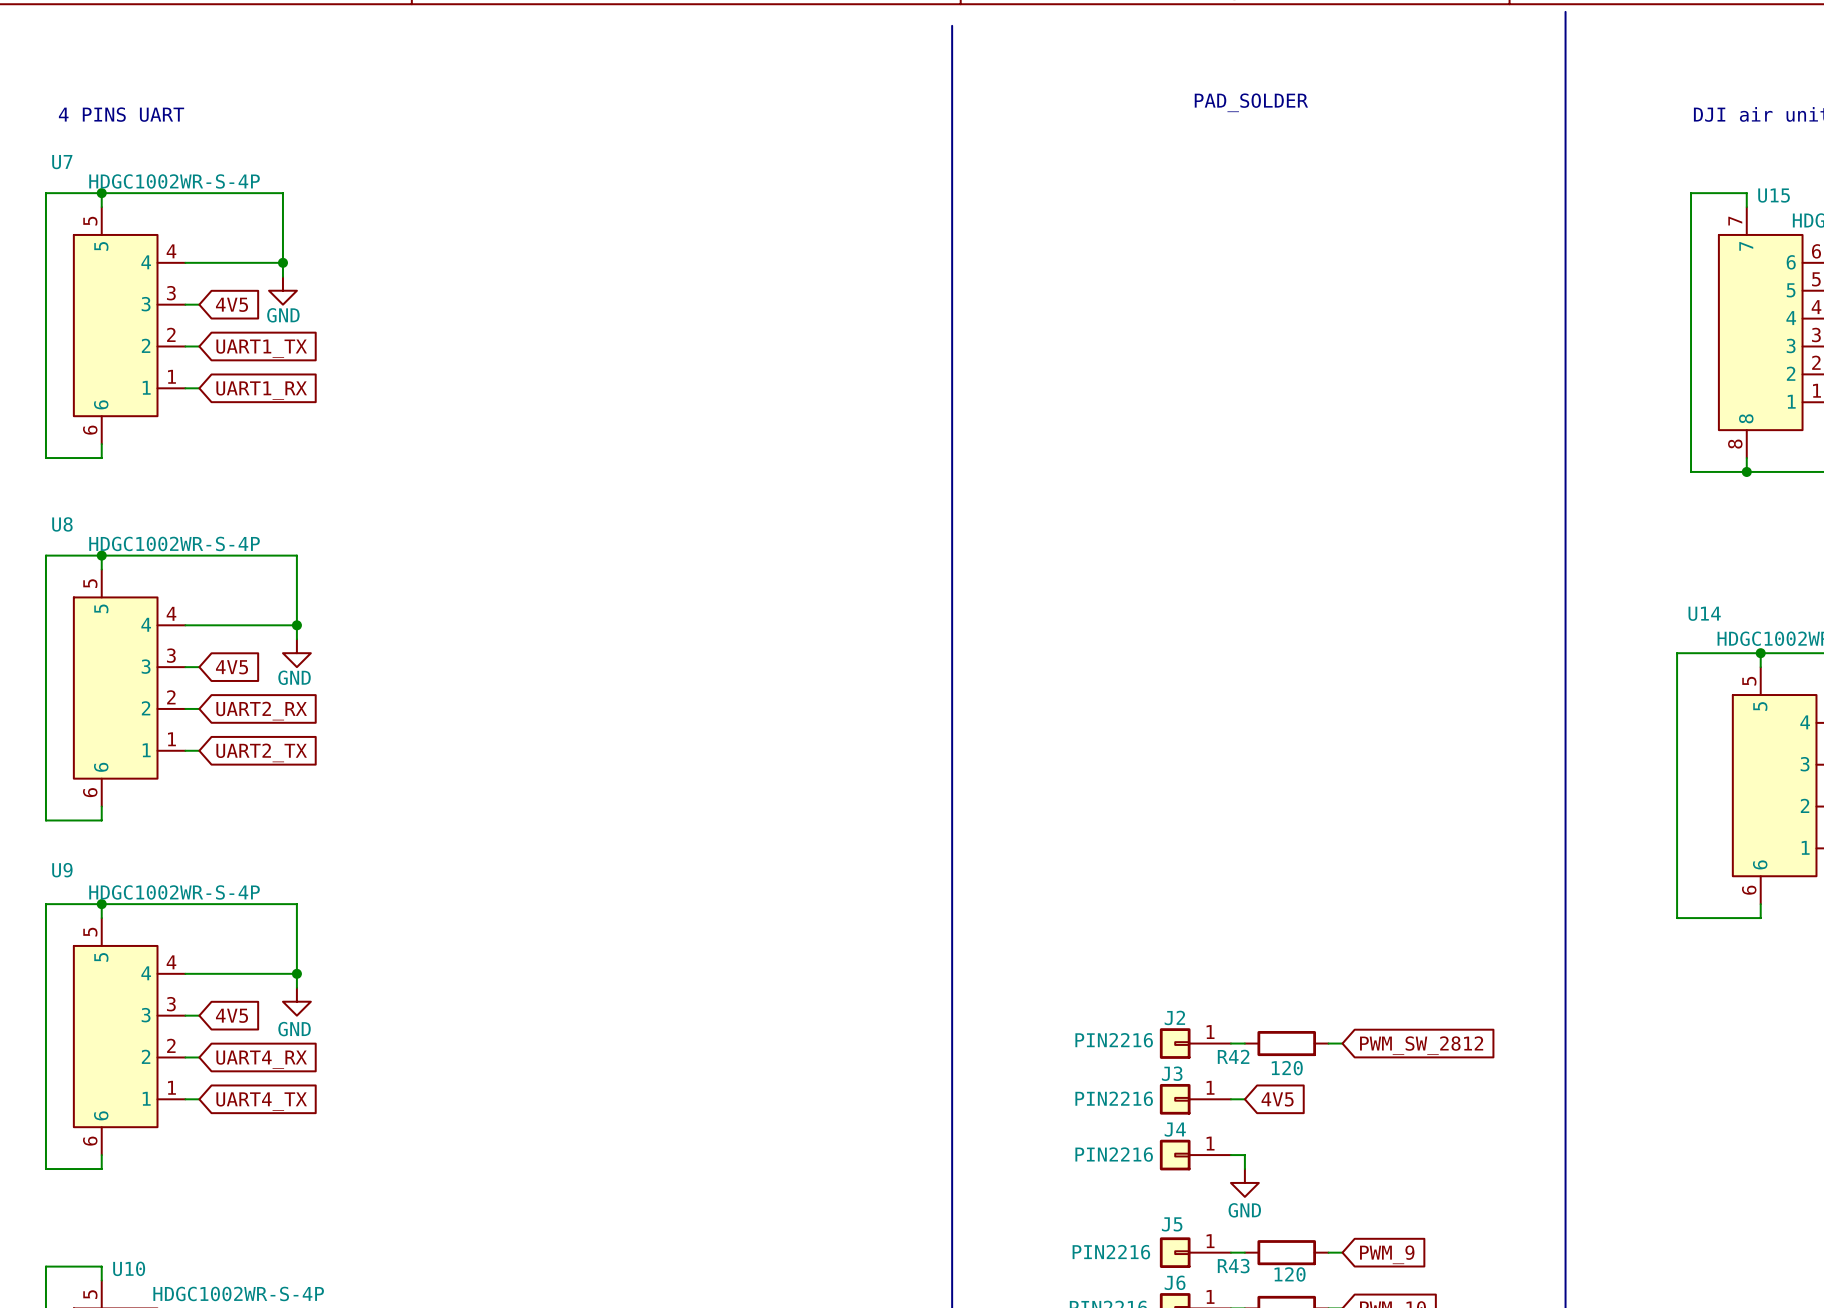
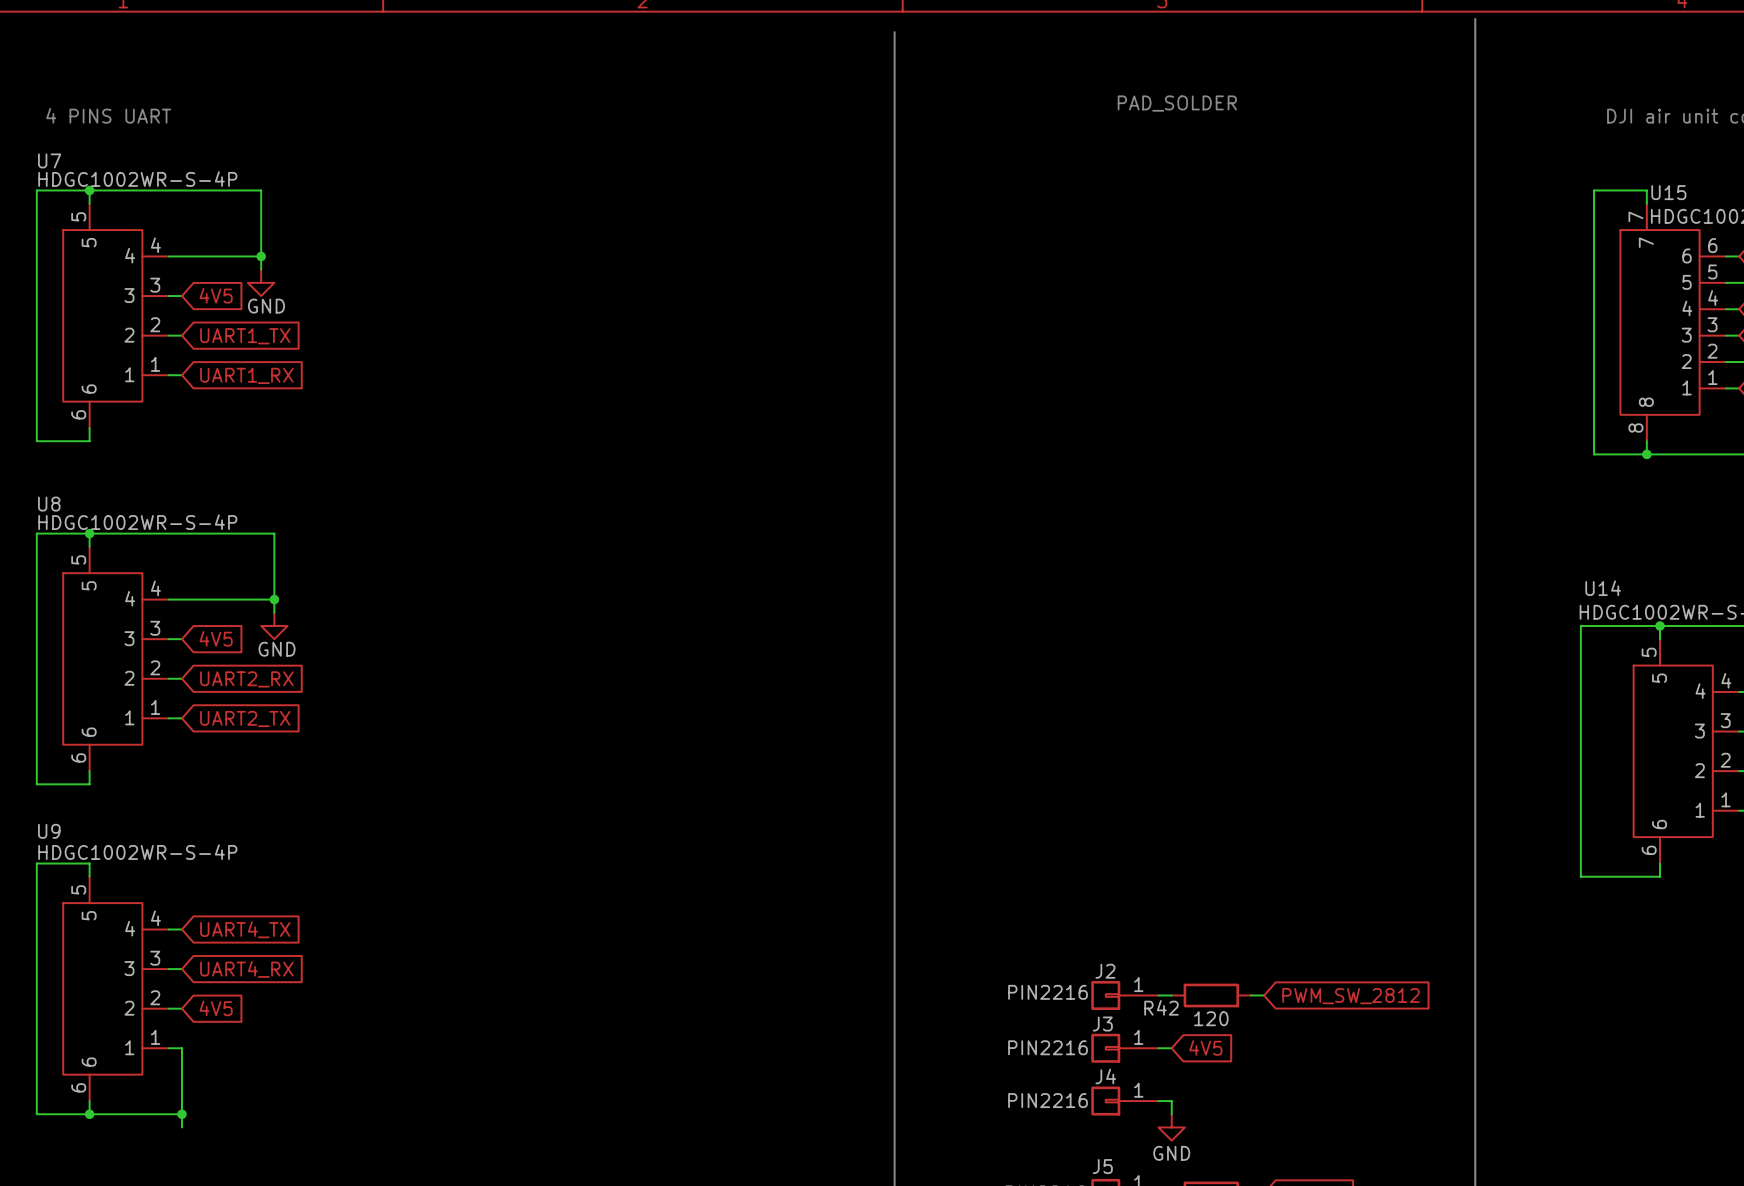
wire: (101, 904) (296, 904) (296, 987) -> none
junction: (101, 904) -> none
wire: (199, 973) (296, 973) -> (89, 1114) (181, 1114)
junction: (296, 973) -> none
power symbol: GND (296, 1001) -> none
global label: 4V5 (231, 1015) -> UART4_RX (246, 969)
global label: UART4_RX (261, 1059) -> 4V5 (216, 1008)
wire: none -> (181, 1048) (181, 1127)
global label position: UART4_TX (261, 1101) -> UART4_TX (245, 929)
junction: none -> (89, 1114)
junction: none -> (181, 1114)

